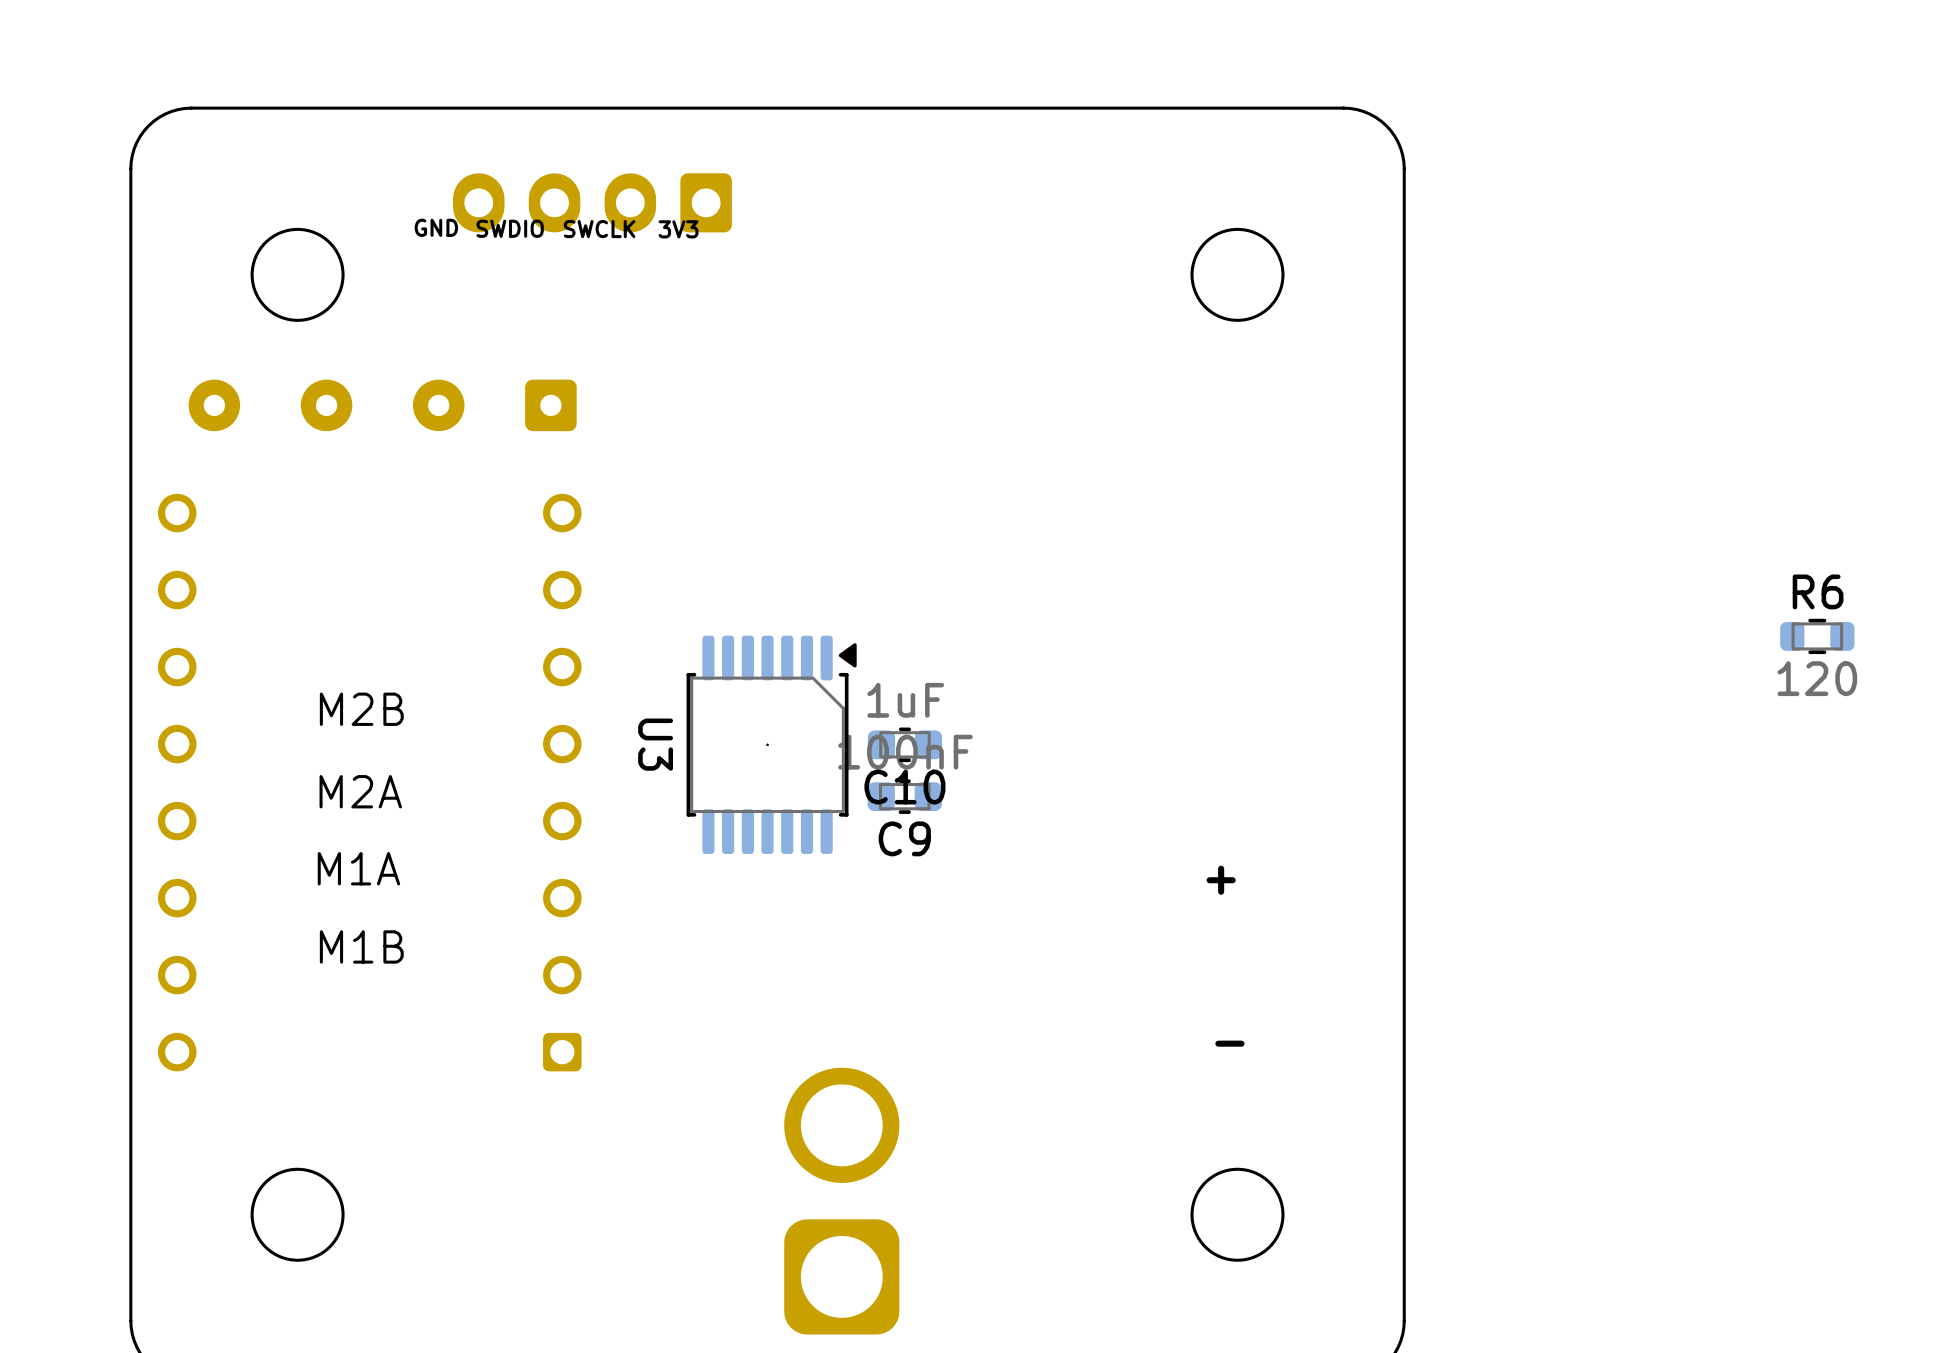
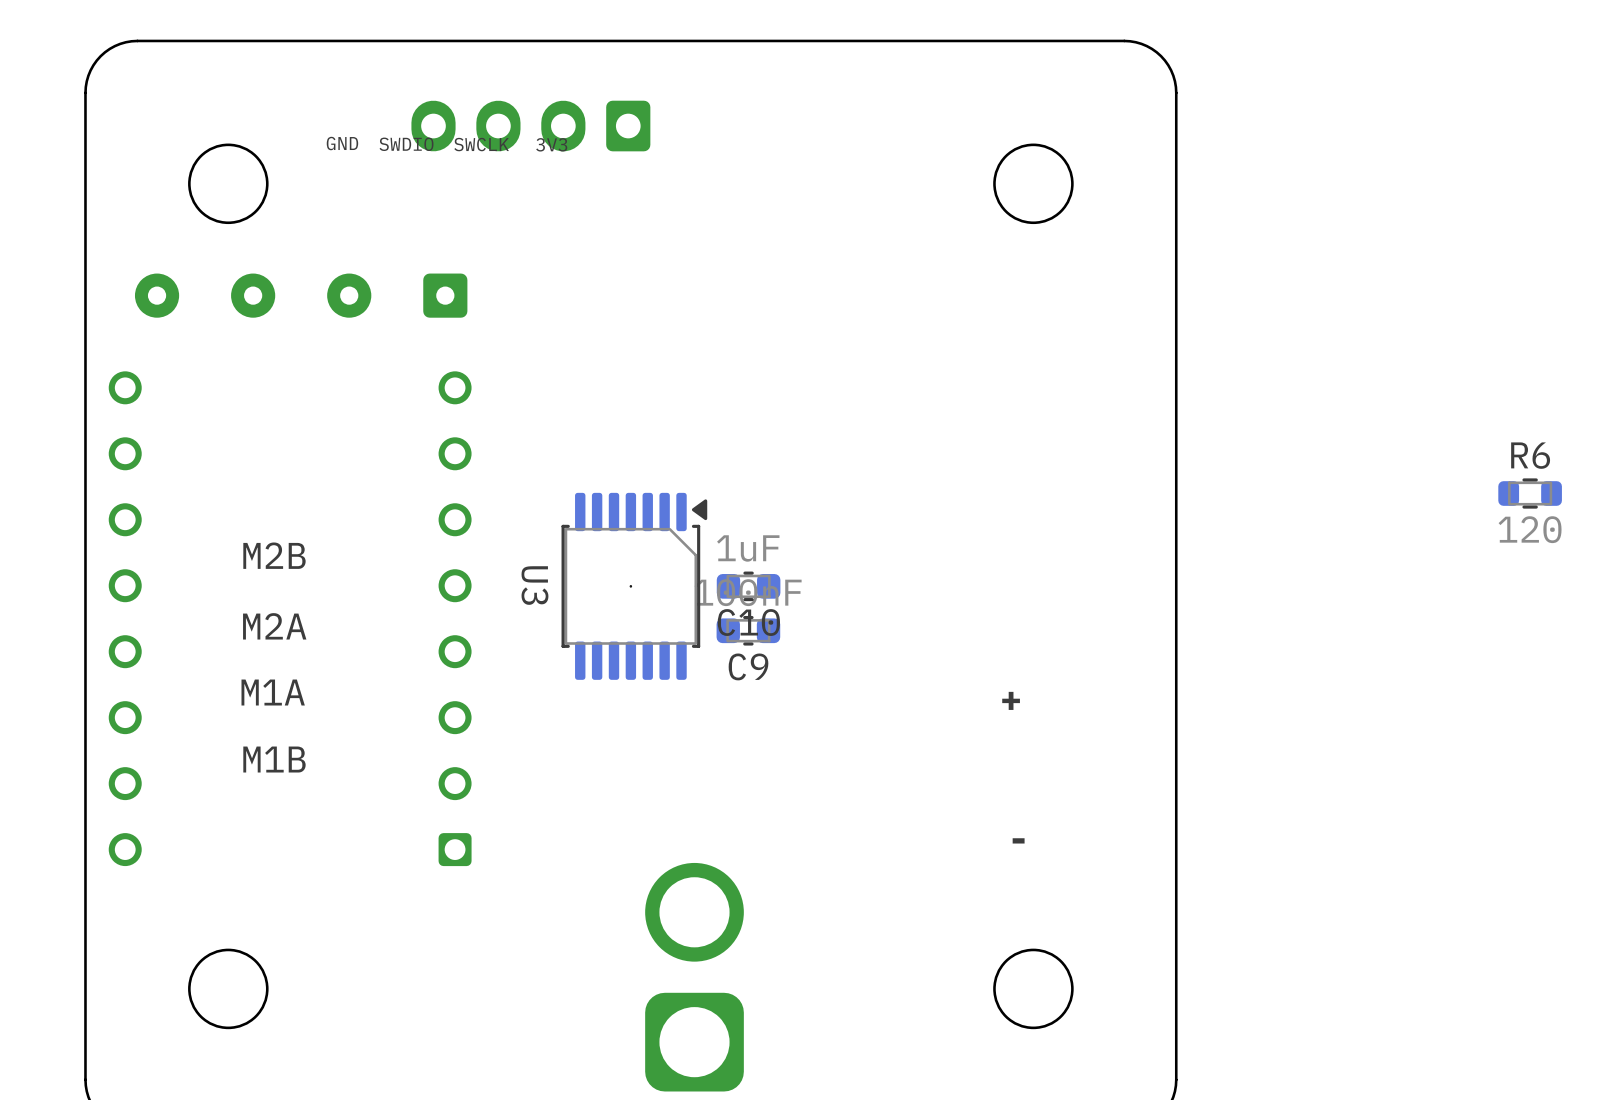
part position: (592, 202) -> (530, 126)

